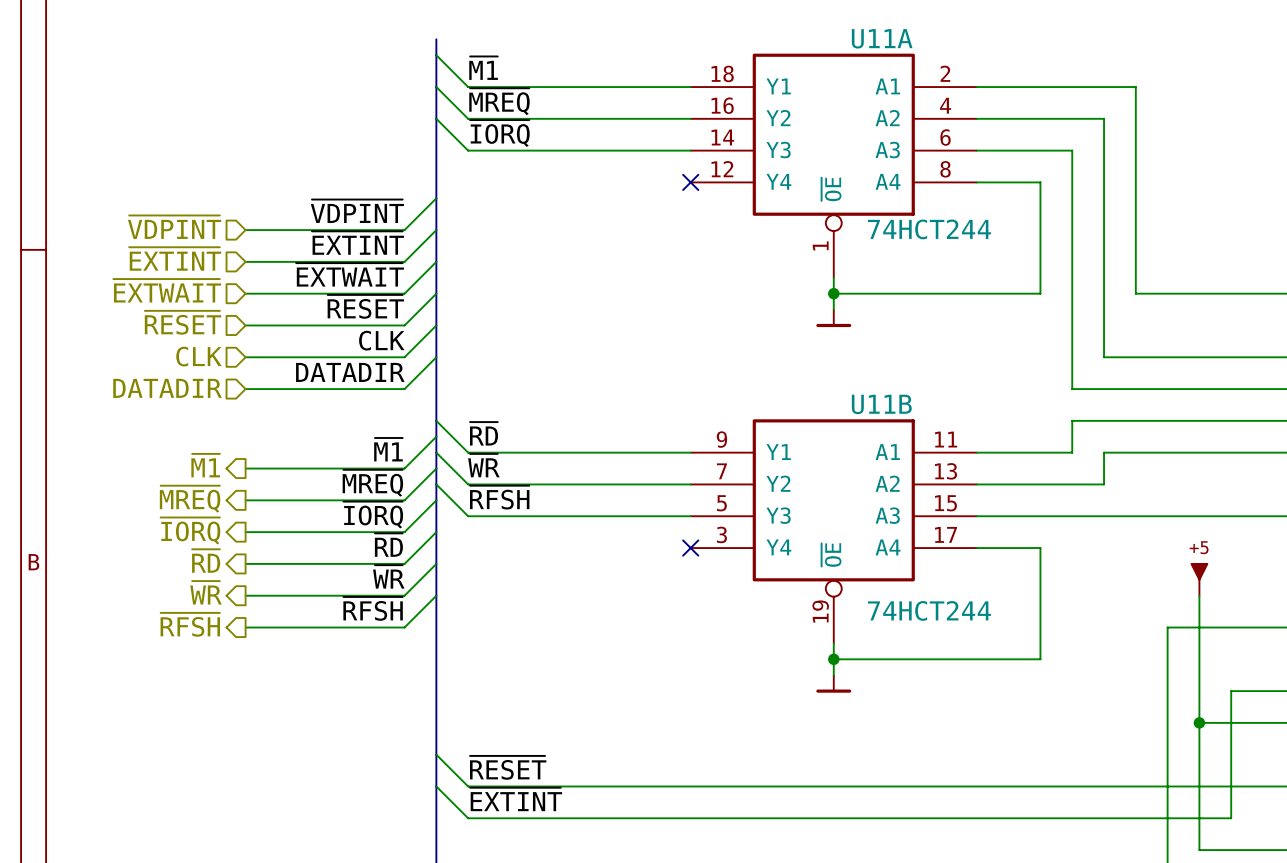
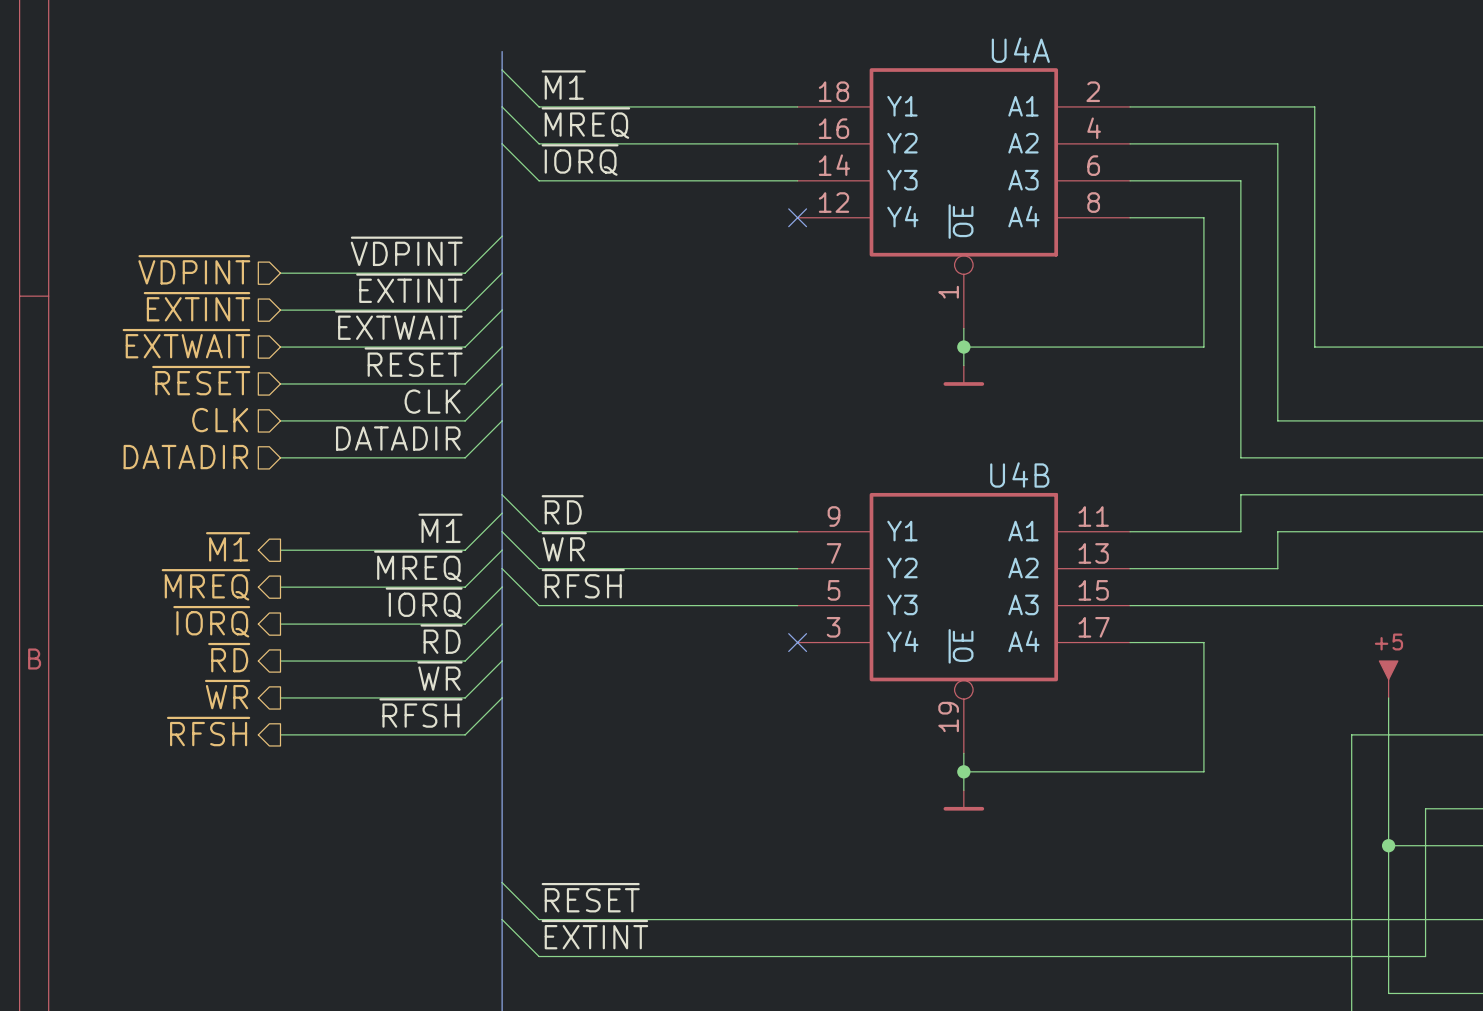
U11A name: U11A (882, 38) -> U4A (1020, 50)
U11A value: 74HCT244 (929, 229) -> none
U11B name: U11B (881, 404) -> U4B (1019, 474)
U11B value: 74HCT244 (929, 610) -> none

